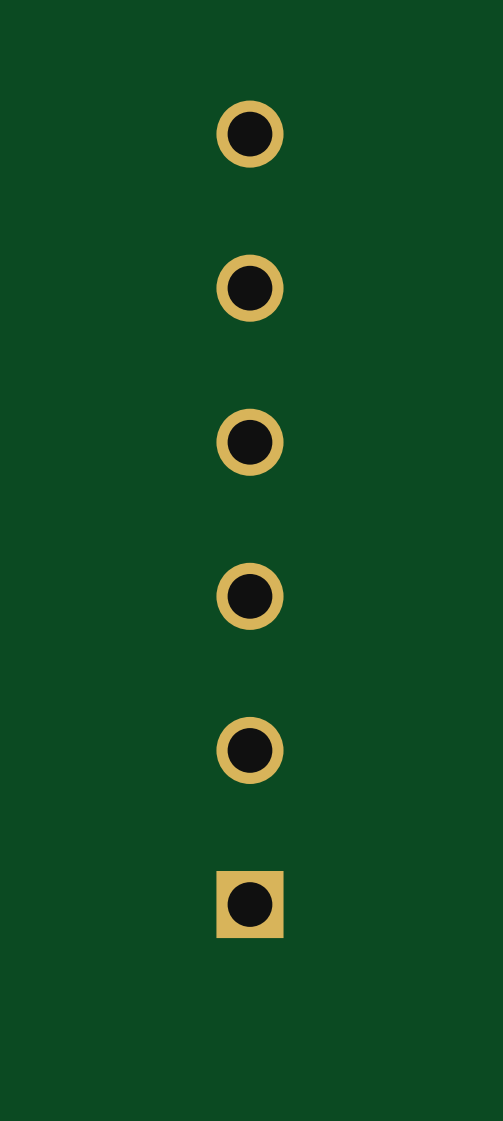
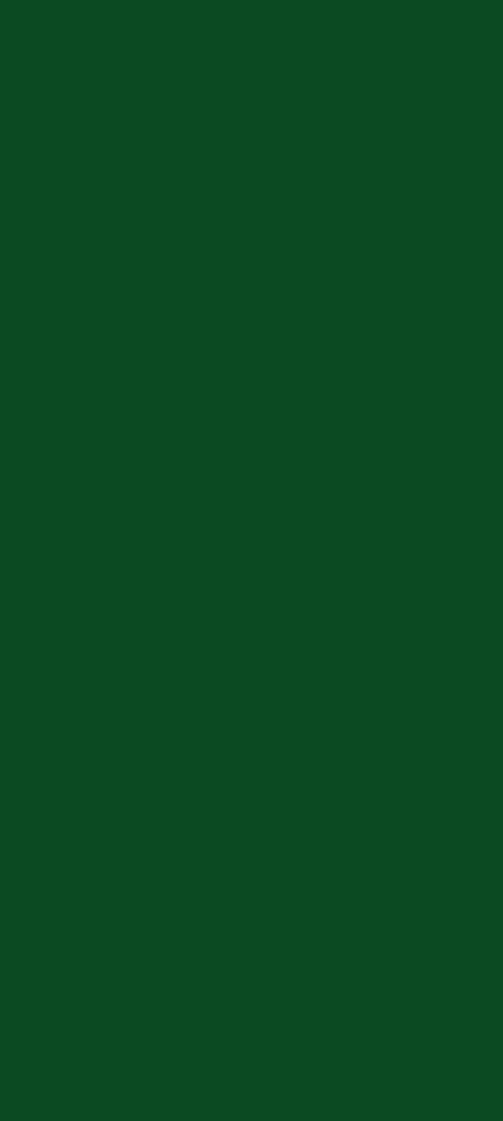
part: (249, 519) -> none

